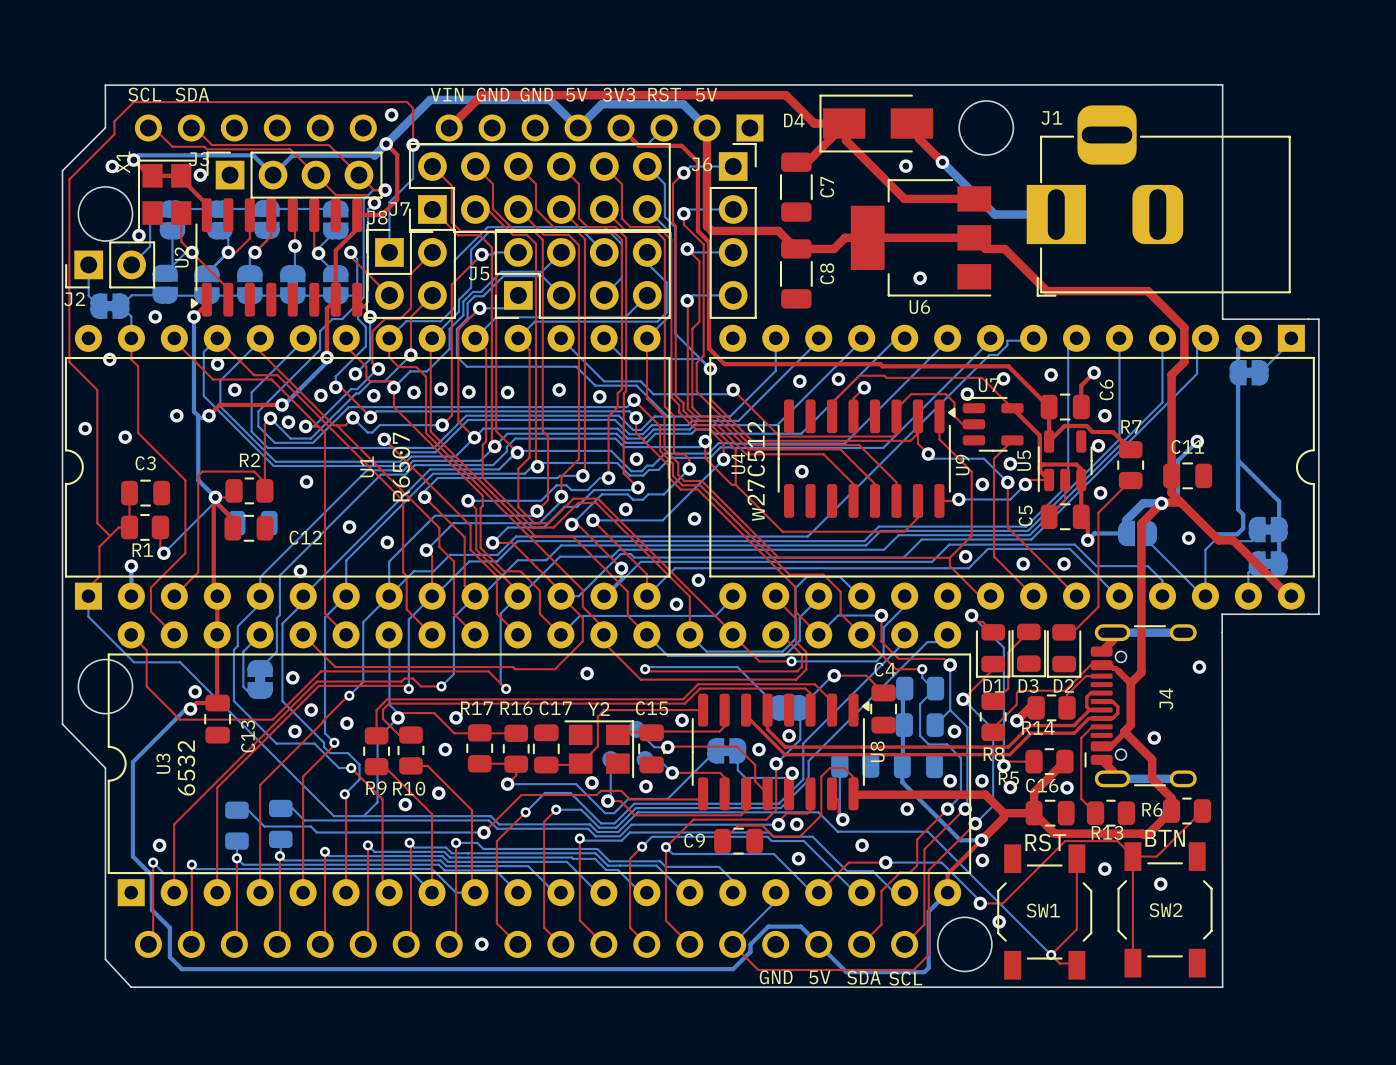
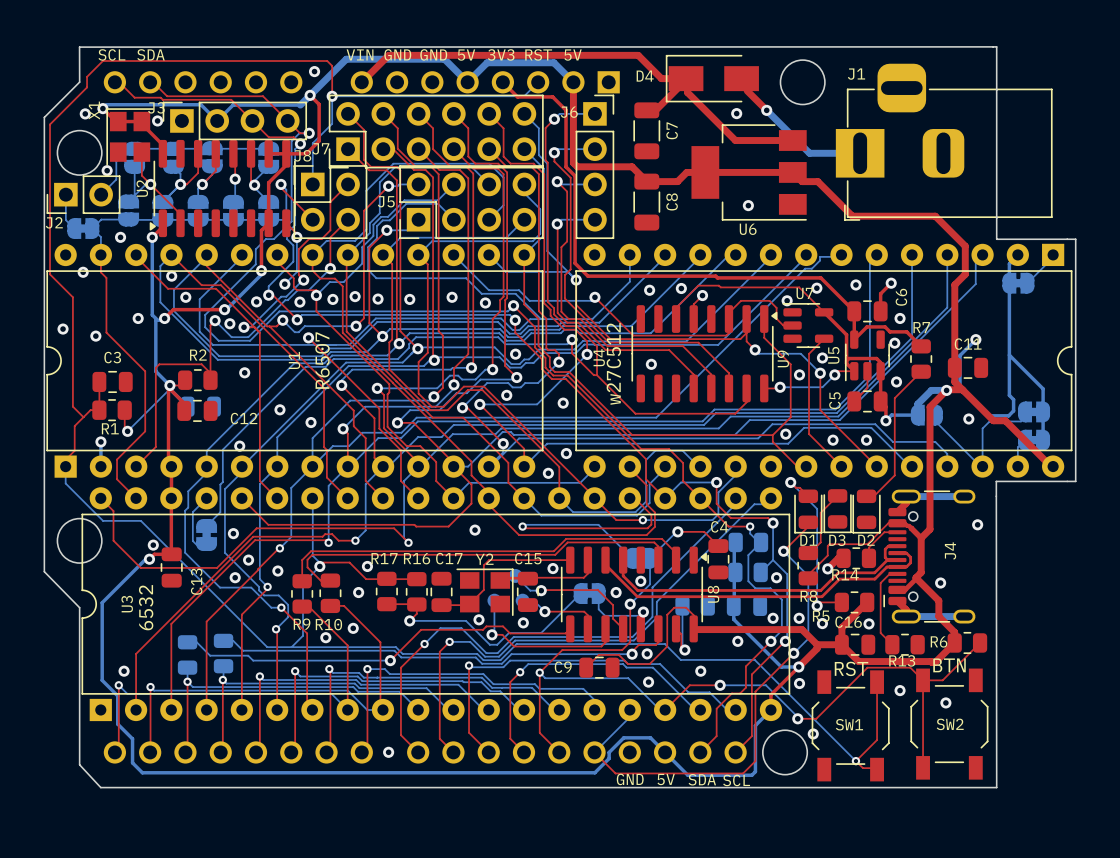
top track: none -> (268, 153) (286, 153)

